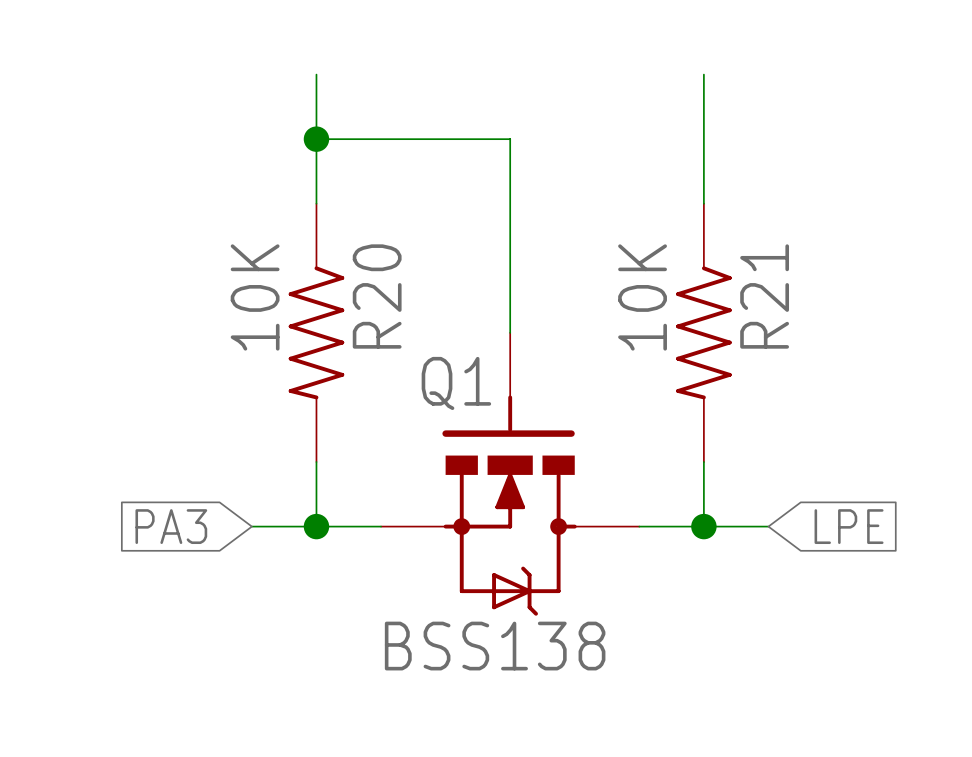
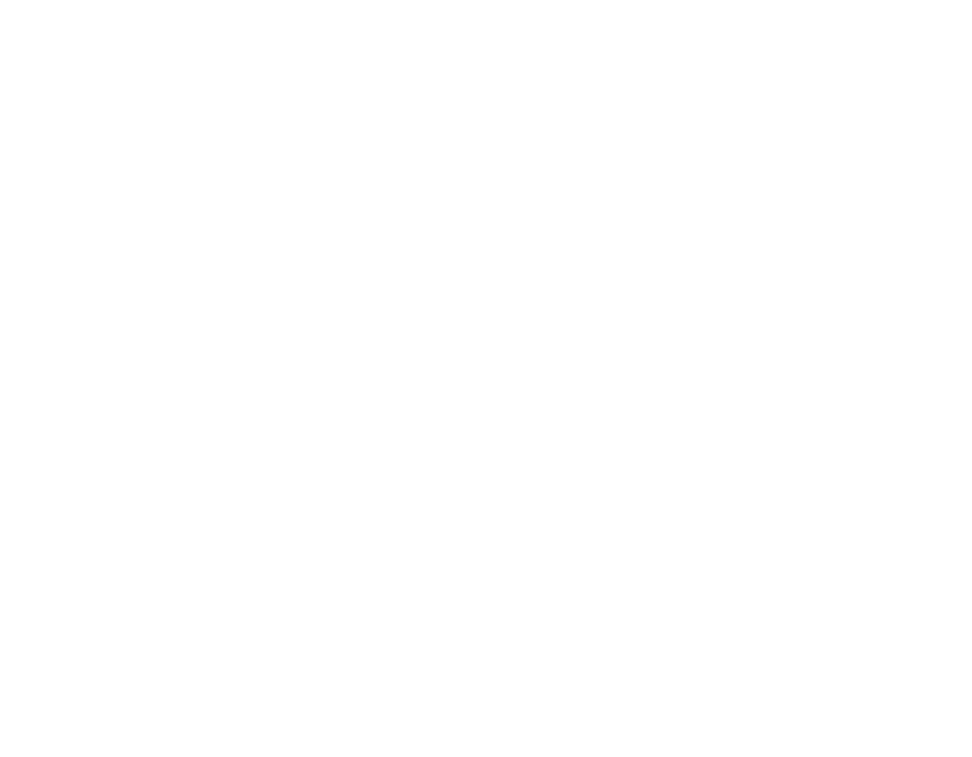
wire: (316, 74) (316, 203) -> none
wire: (703, 74) (703, 203) -> none
wire: (316, 139) (510, 139) (510, 332) -> none
junction: (316, 139) -> none
R20: 10K (316, 332) -> none
R21: 10K (703, 332) -> none
wire: (316, 462) (316, 526) -> none
wire: (703, 462) (703, 526) -> none
Q1: BSS138 (510, 474) -> none
global label: PA3 (171, 526) -> none
wire: (251, 526) (381, 526) -> none
junction: (316, 526) -> none
wire: (639, 526) (768, 526) -> none
junction: (703, 526) -> none
global label: LPE (849, 526) -> none

